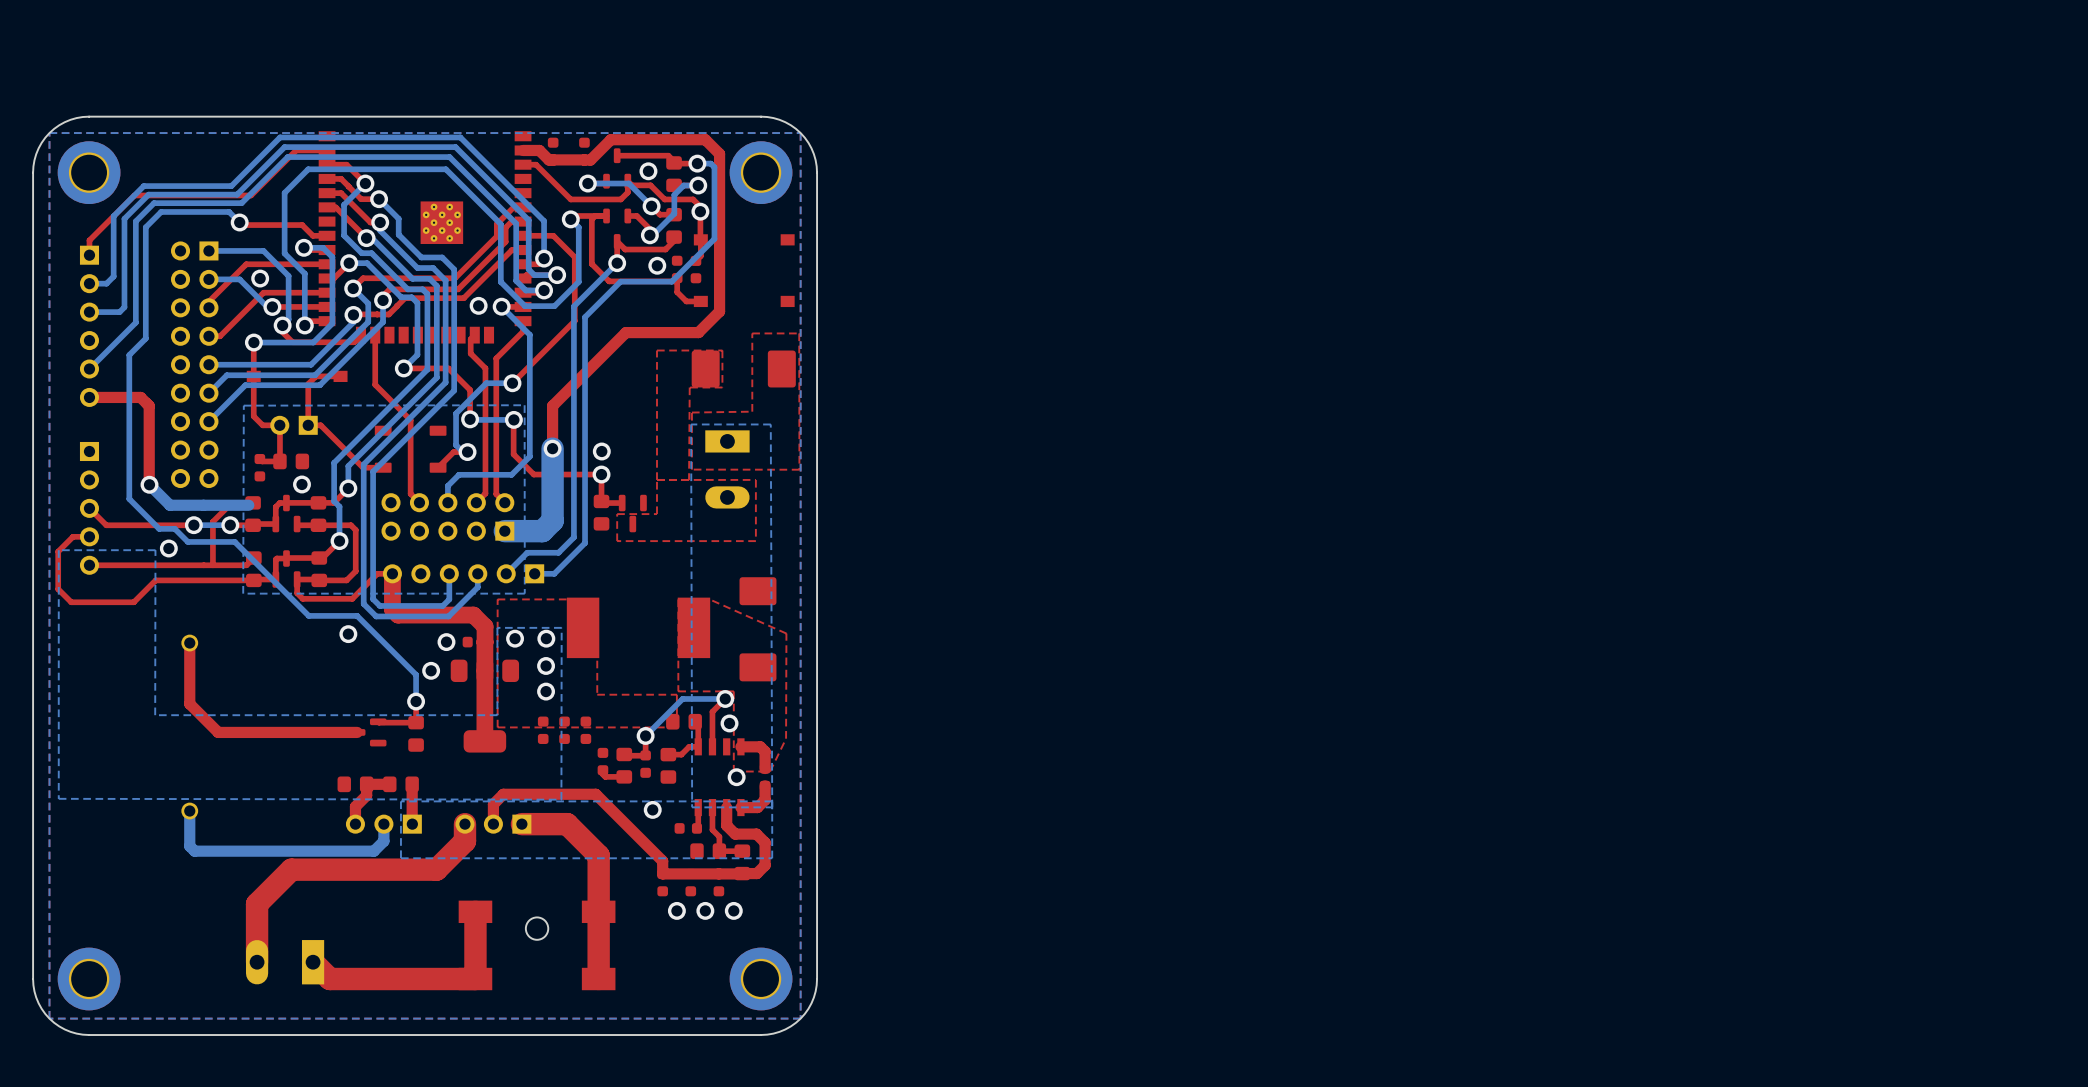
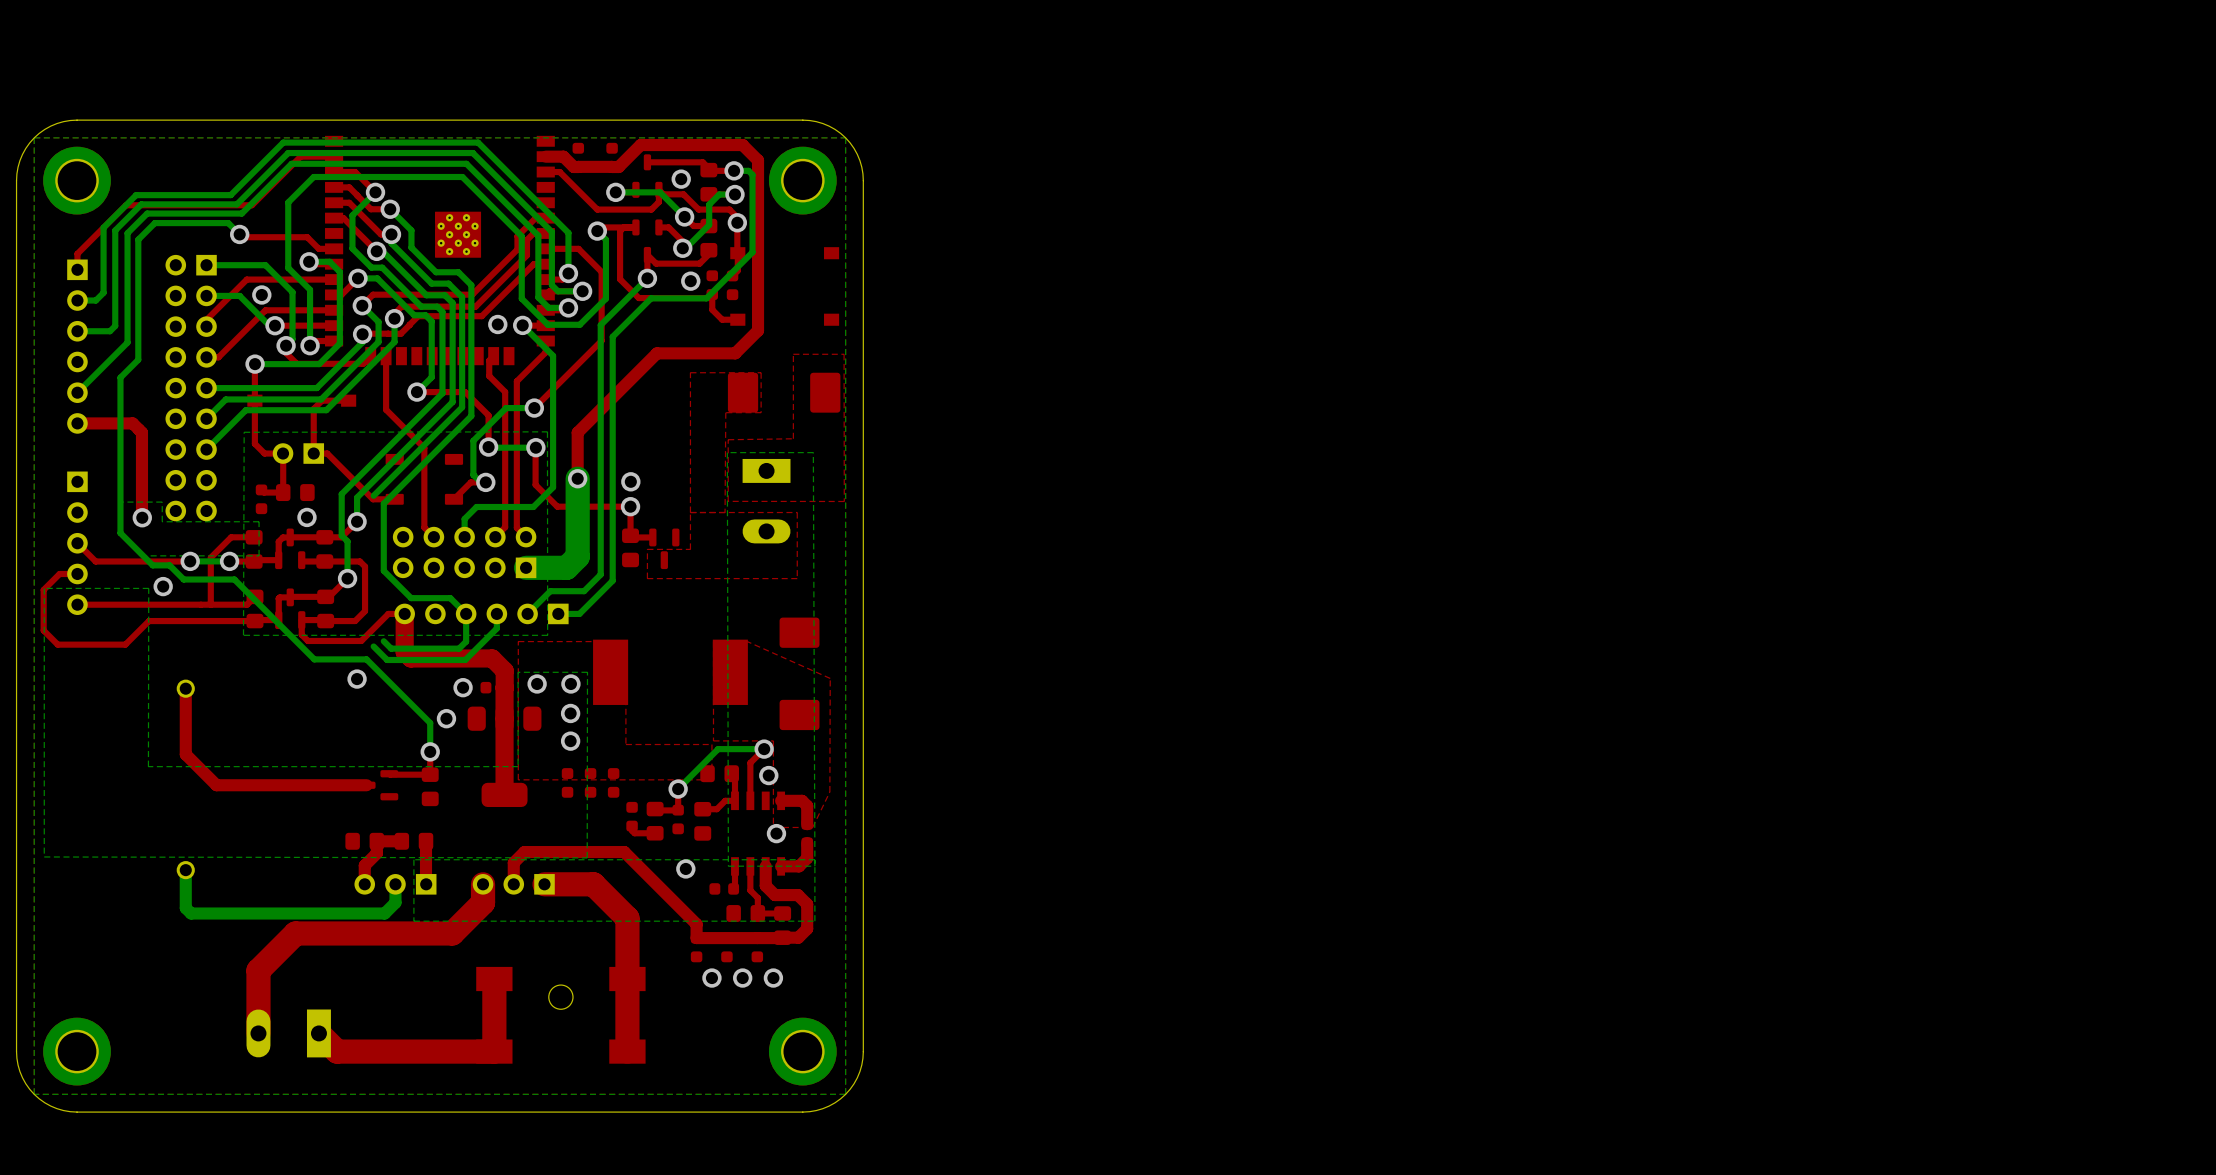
bottom track: (363, 464) (363, 603) -> none
bottom zone outline: none -> (162, 502) (120, 502) (120, 534) (141, 555) (259, 555) (259, 521) (162, 521) (162, 502)
bottom track: (149, 484) (169, 505) (248, 505) -> none
bottom track: (373, 533) (373, 599) -> (383, 570) (411, 598) (450, 598) (466, 613)

